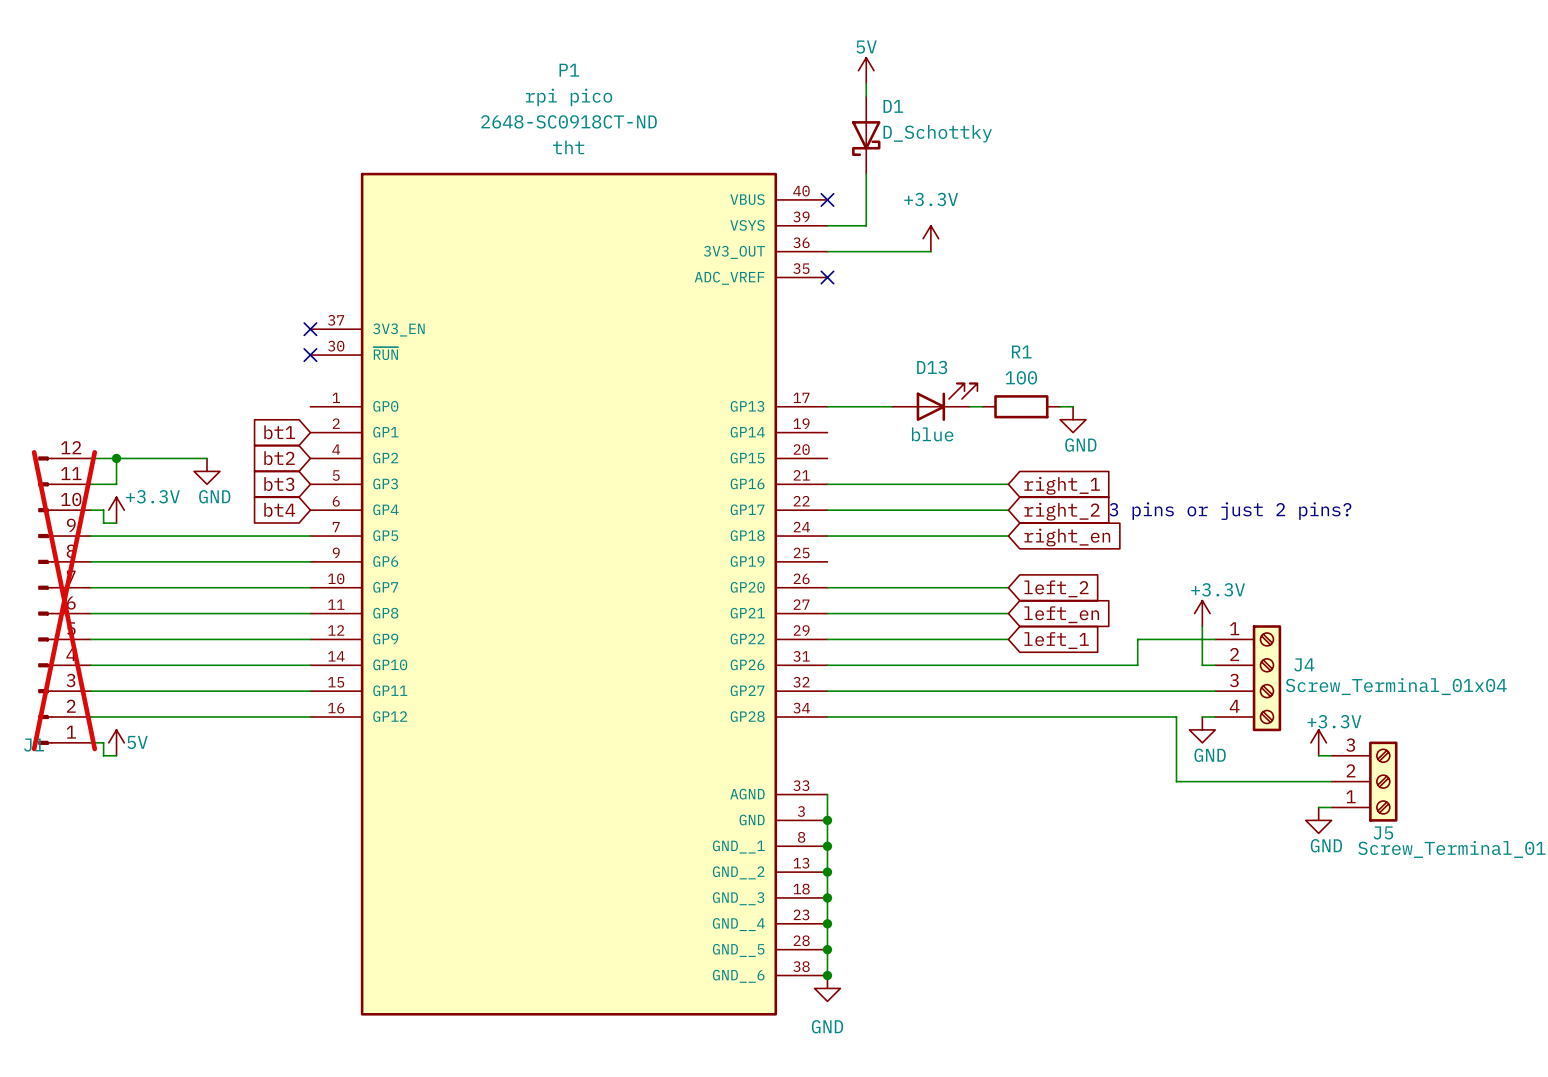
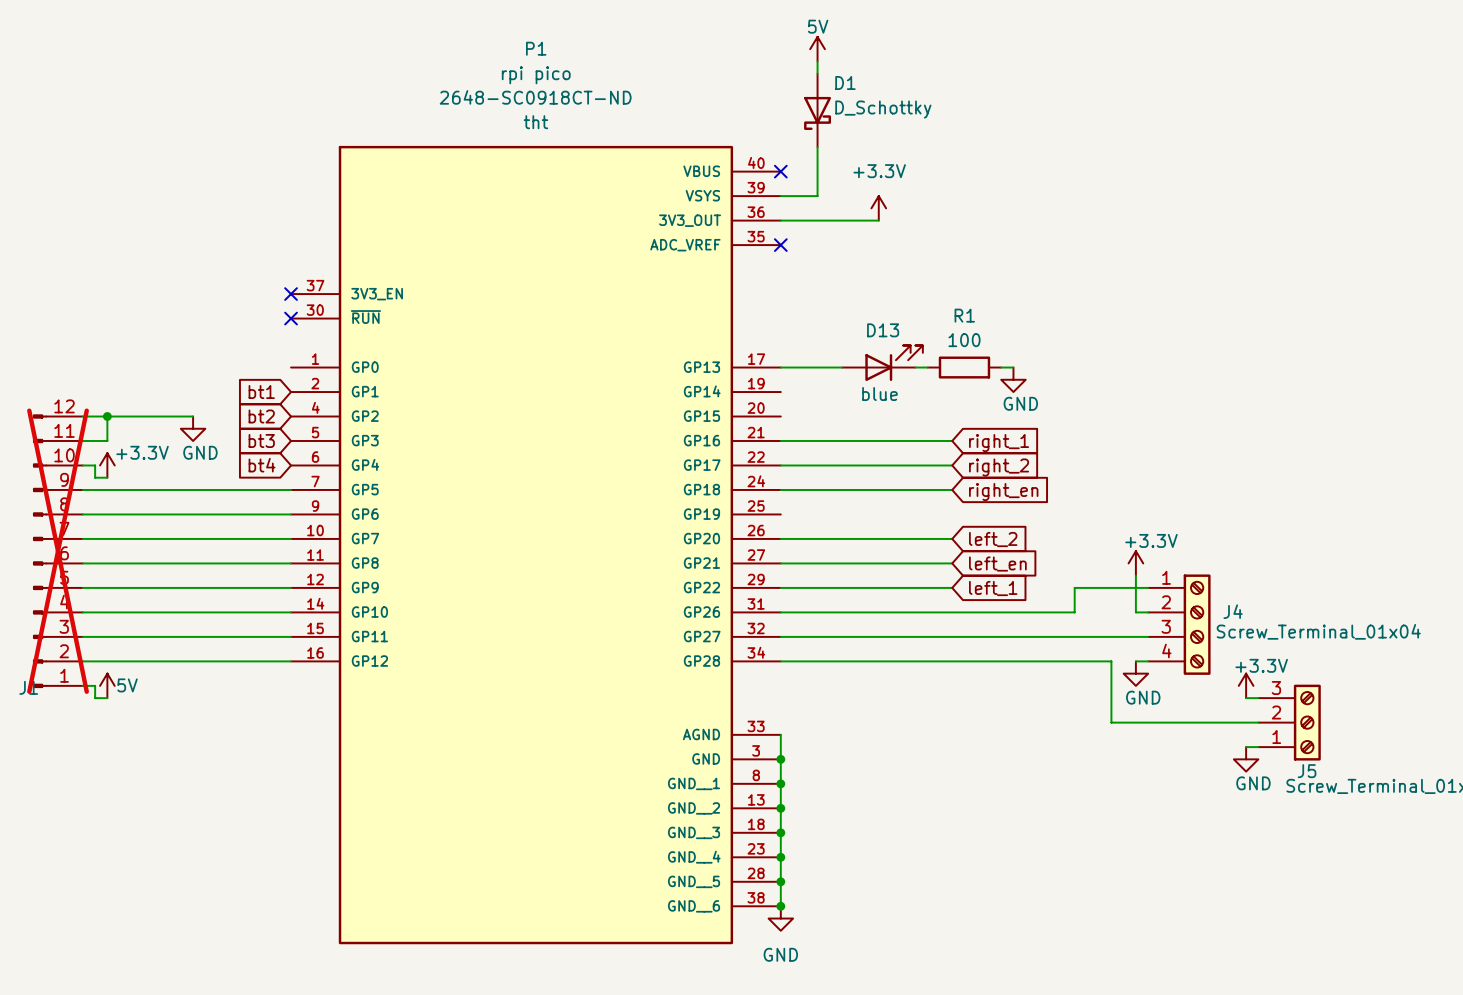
text: 3 pins or just 2 pins? (1230, 511) -> none

